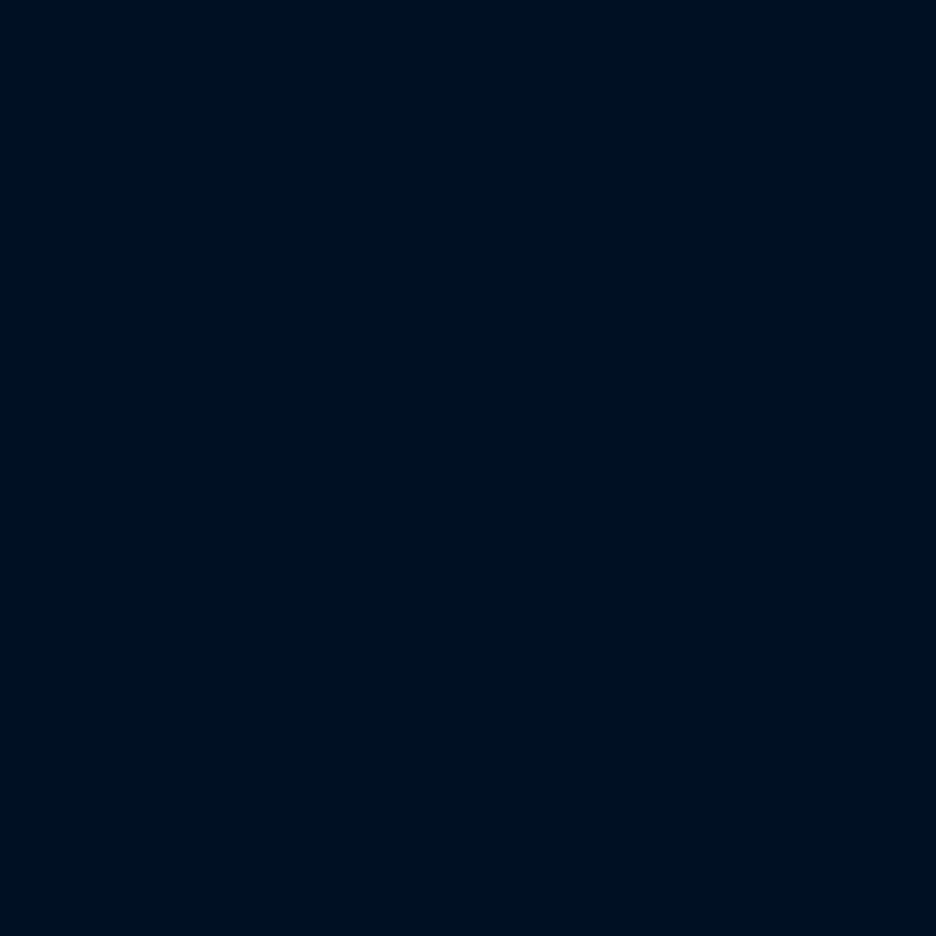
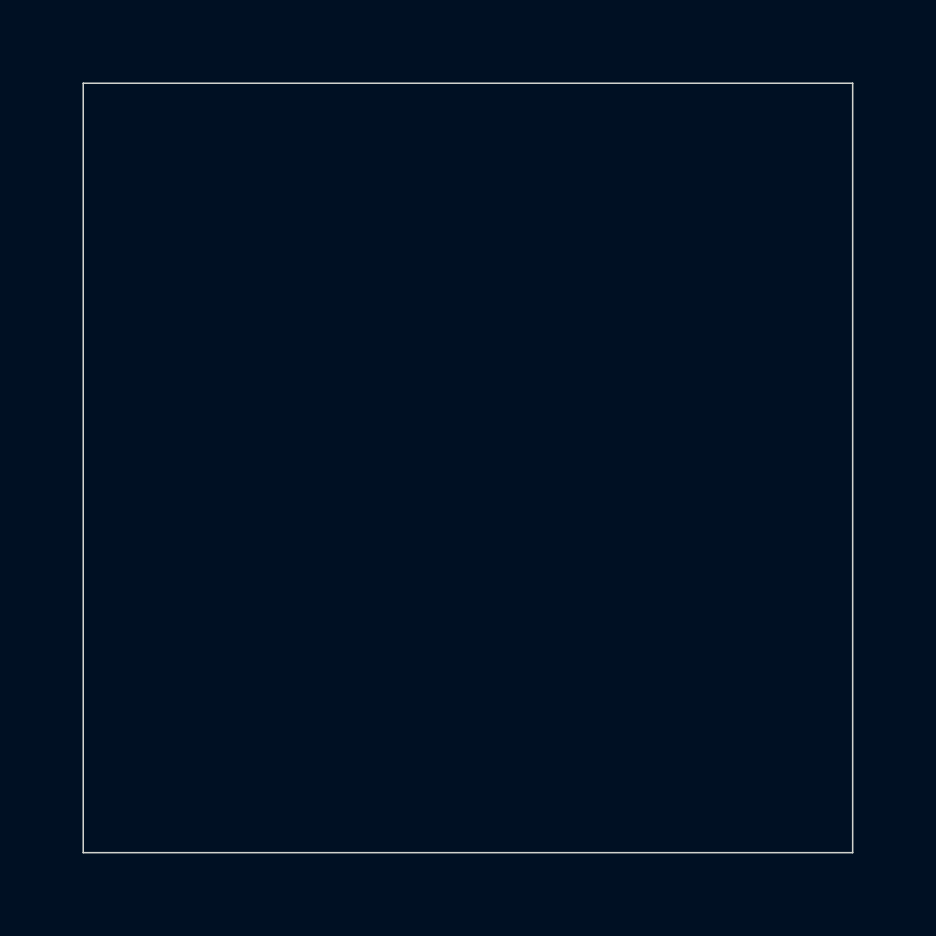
board edge: none -> (852, 83) (852, 852) (83, 852) (83, 83) (852, 83)

